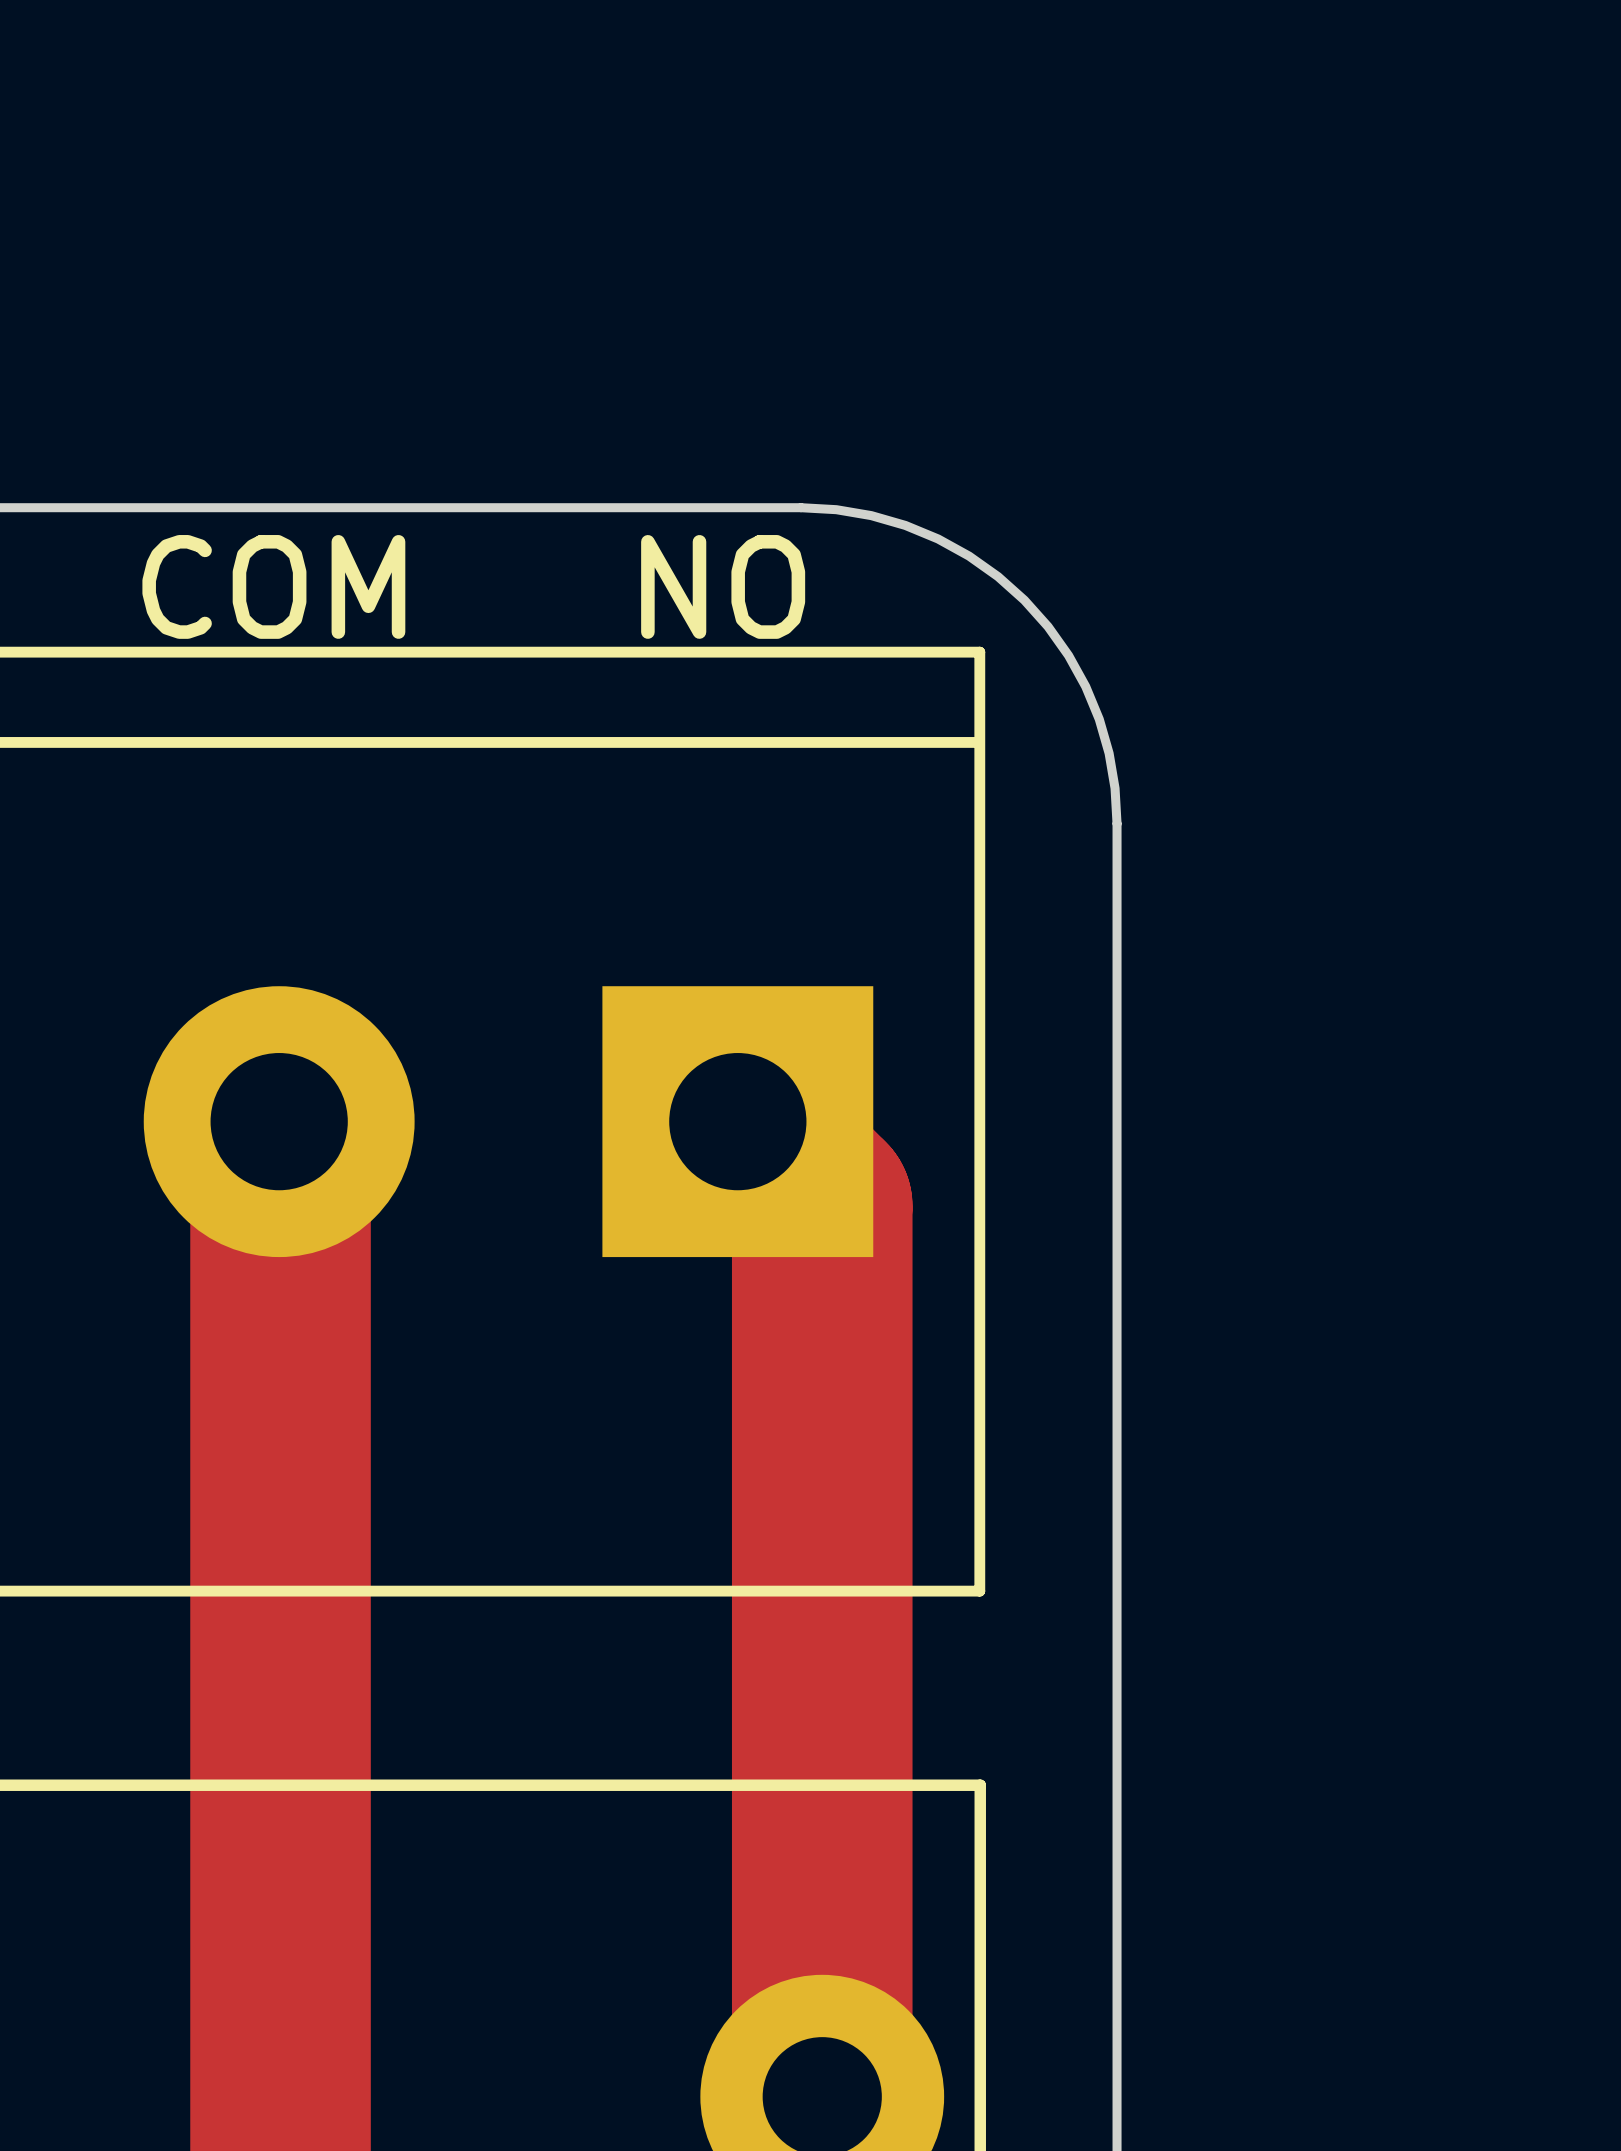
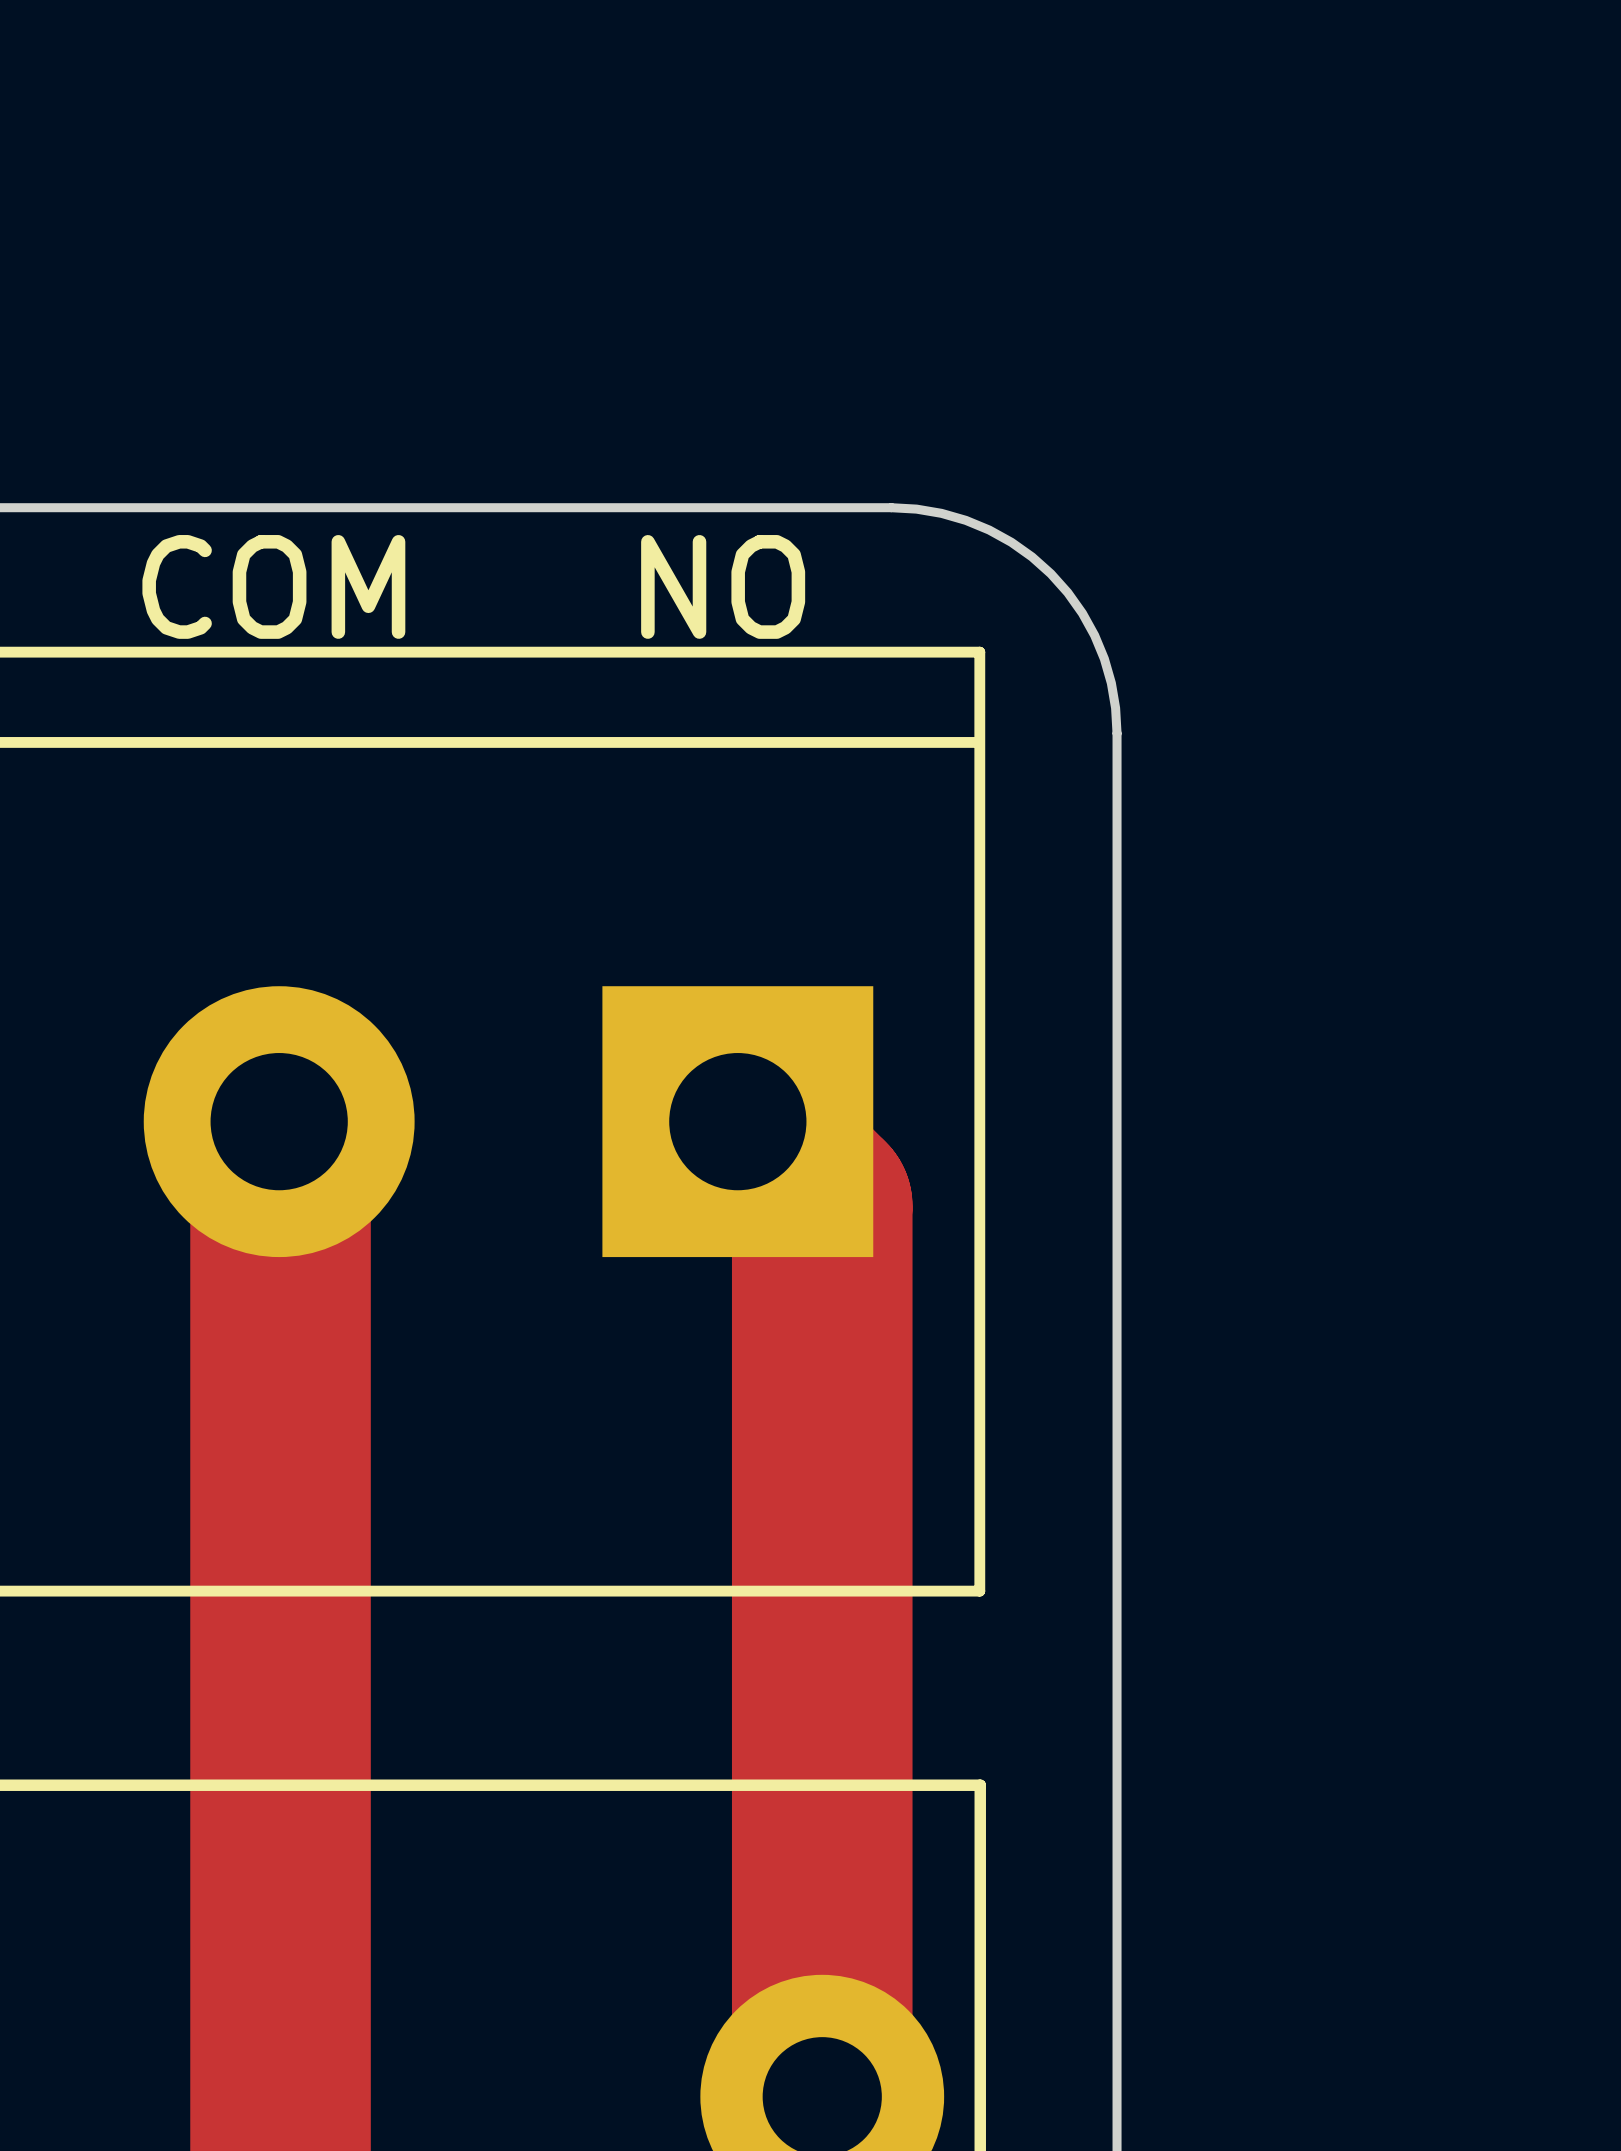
board edge: (801, 507) (836, 509) (871, 515) (905, 525) (938, 538) (969, 556) (998, 576) (1024, 600) (1048, 626) (1068, 655) (1085, 686) (1099, 719) (1109, 753) (1115, 788) (1117, 823) -> (801, 507) (891, 507) (941, 513) (965, 520) (1011, 542) (1050, 573) (1082, 613) (1094, 635) (1111, 683) (1117, 733) (1117, 823)

